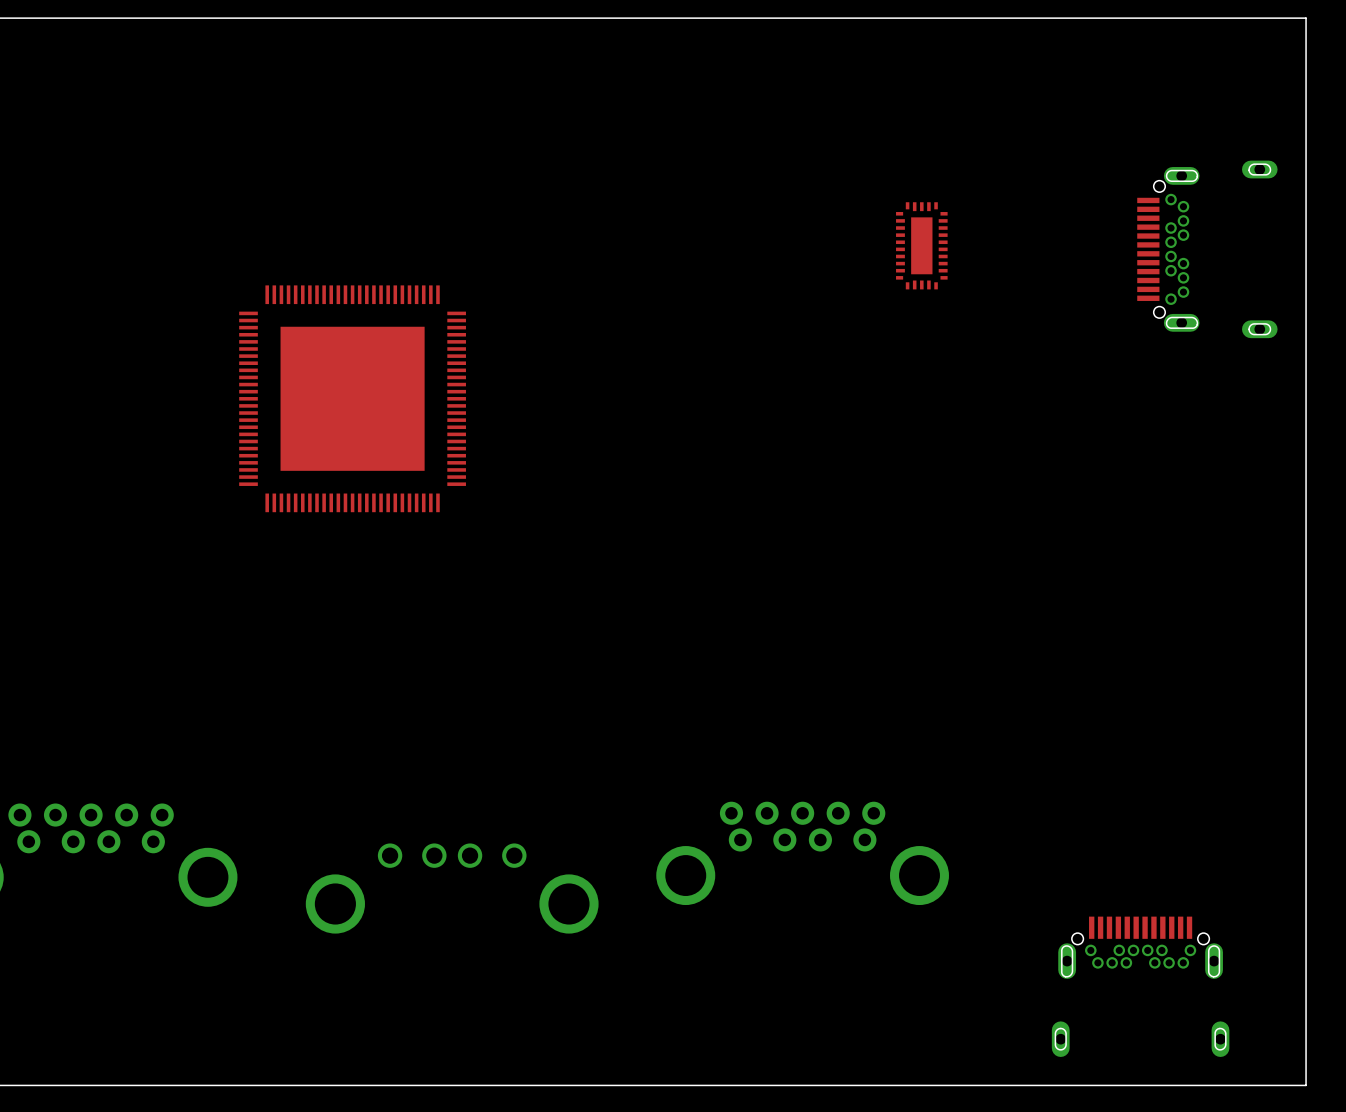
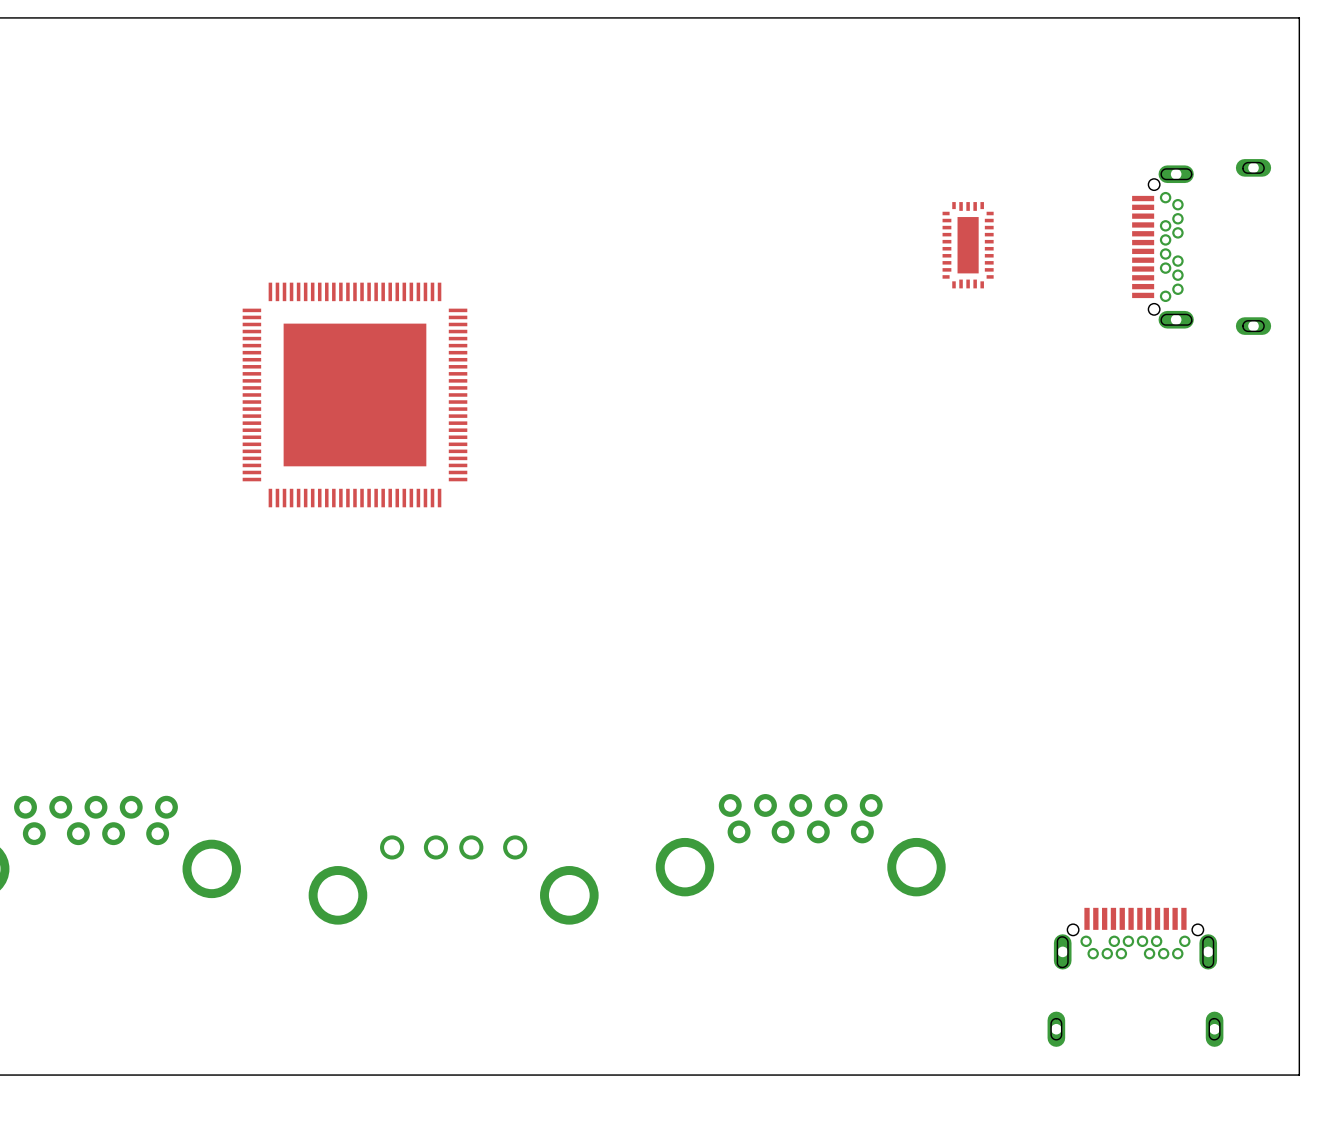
part position: (921, 245) -> (968, 245)

